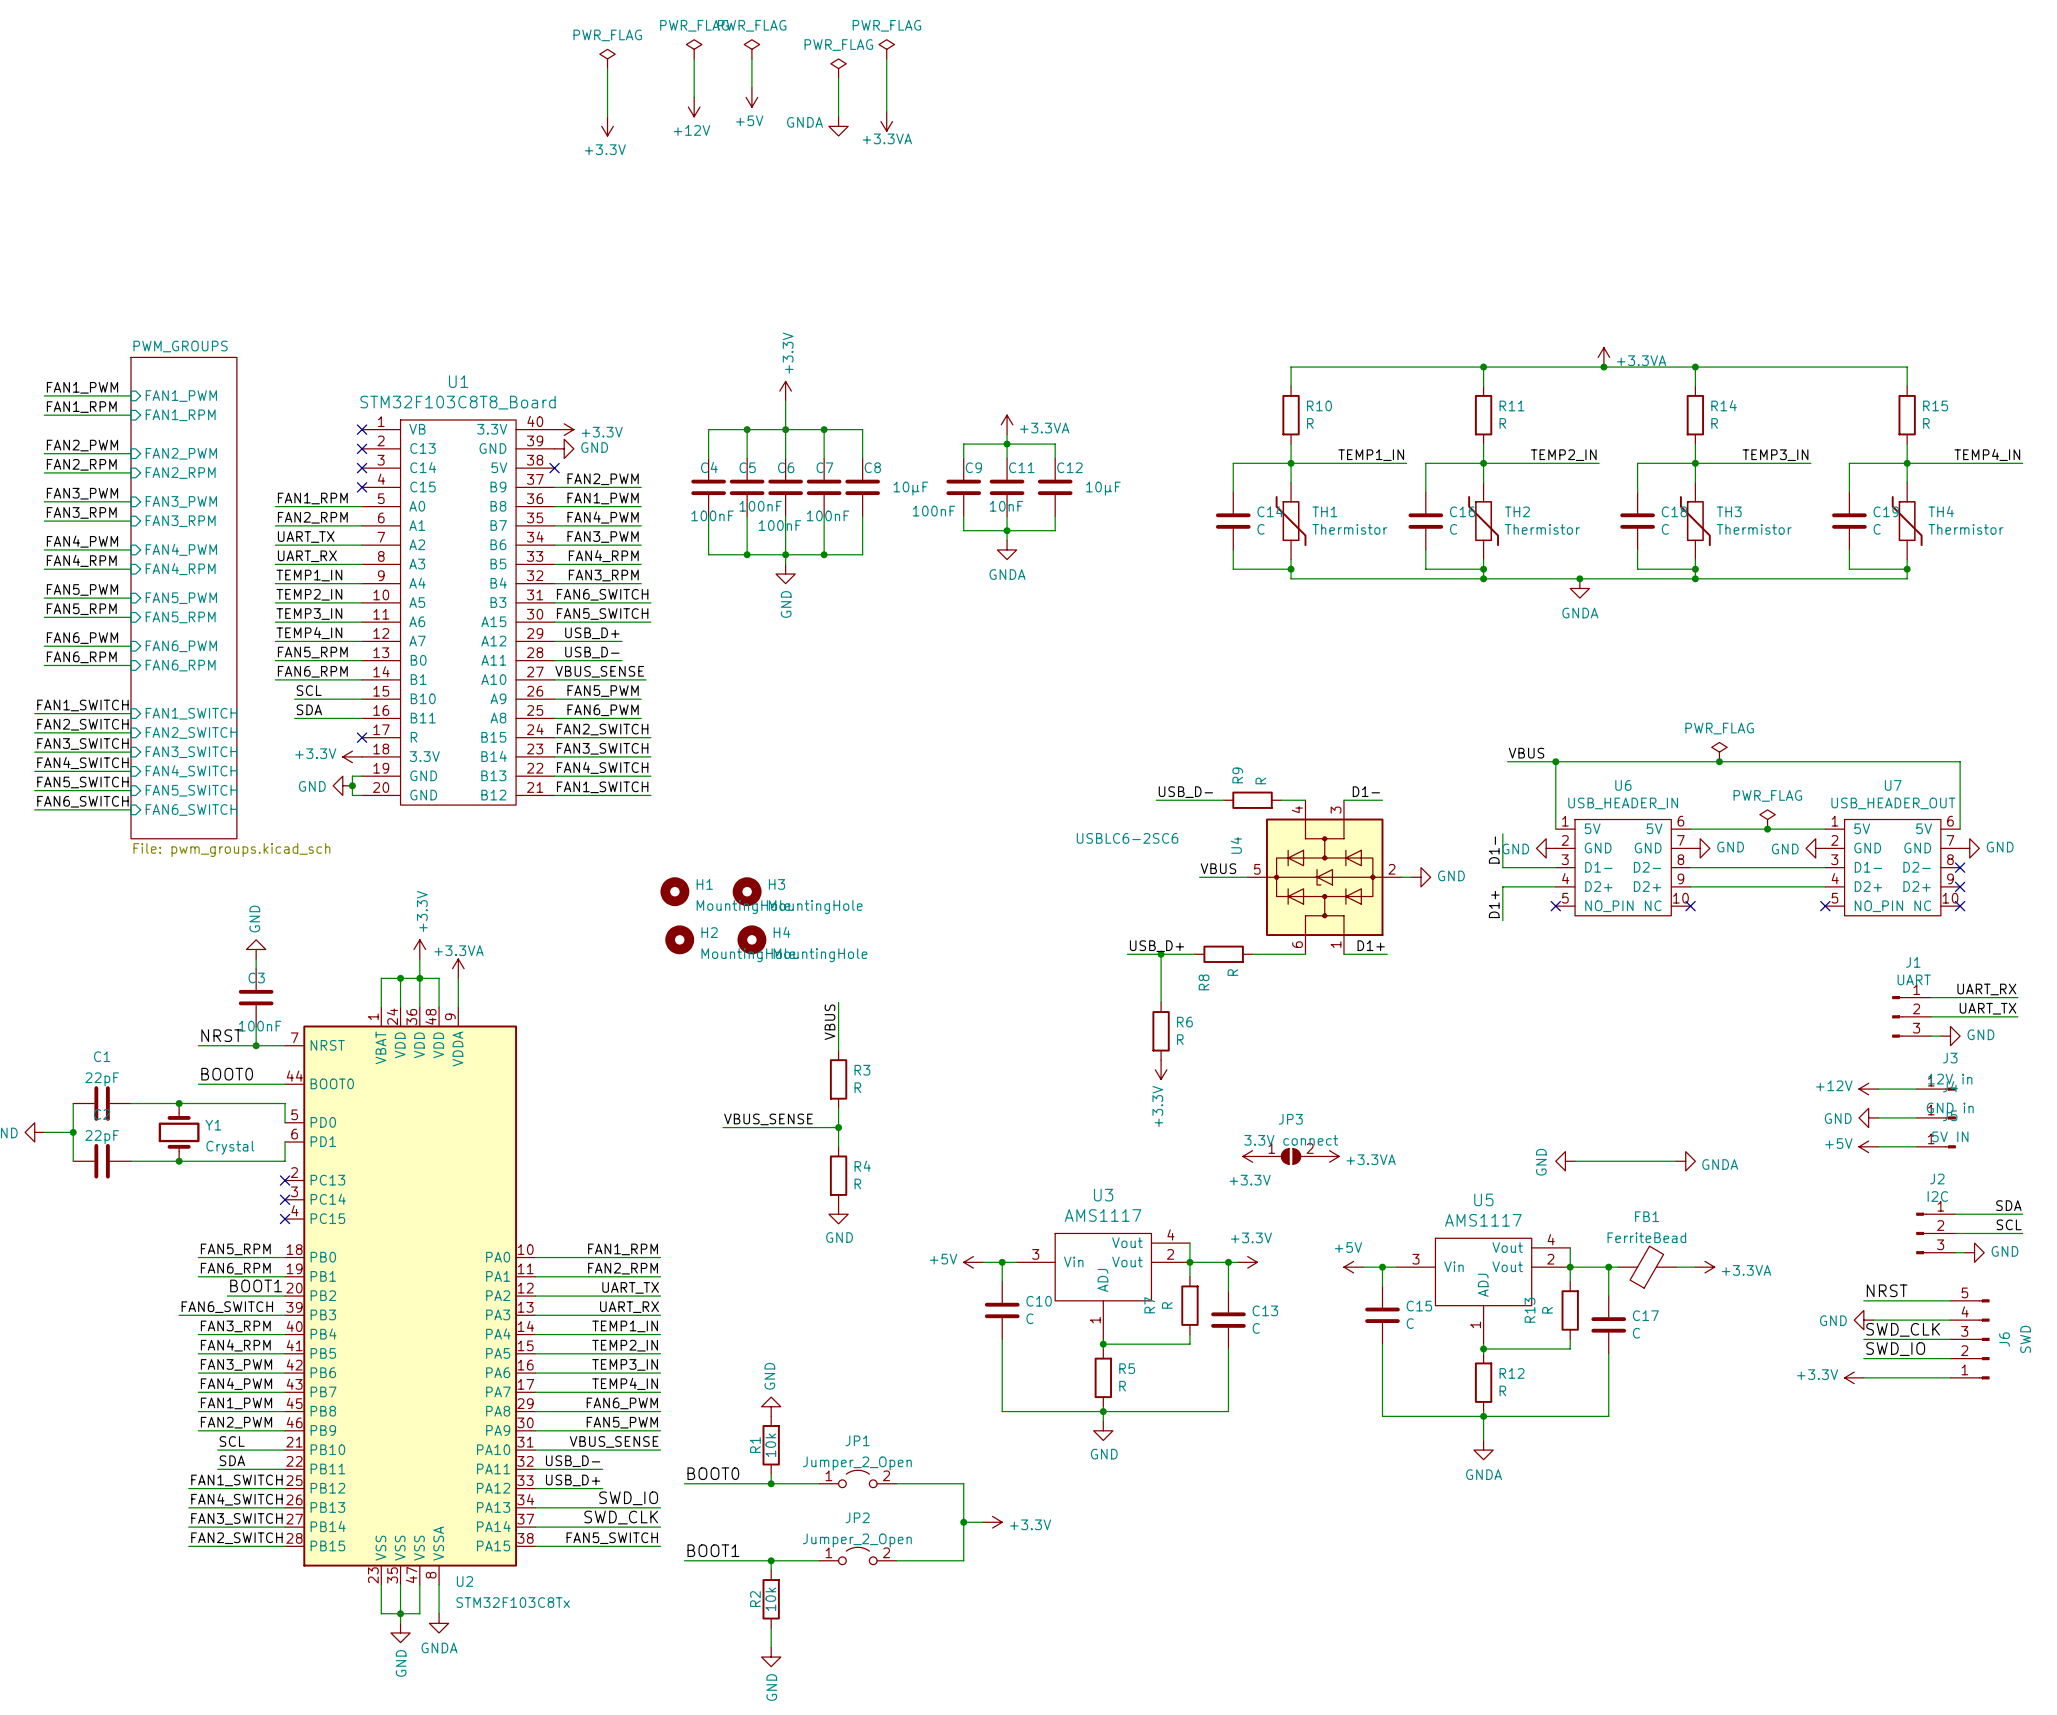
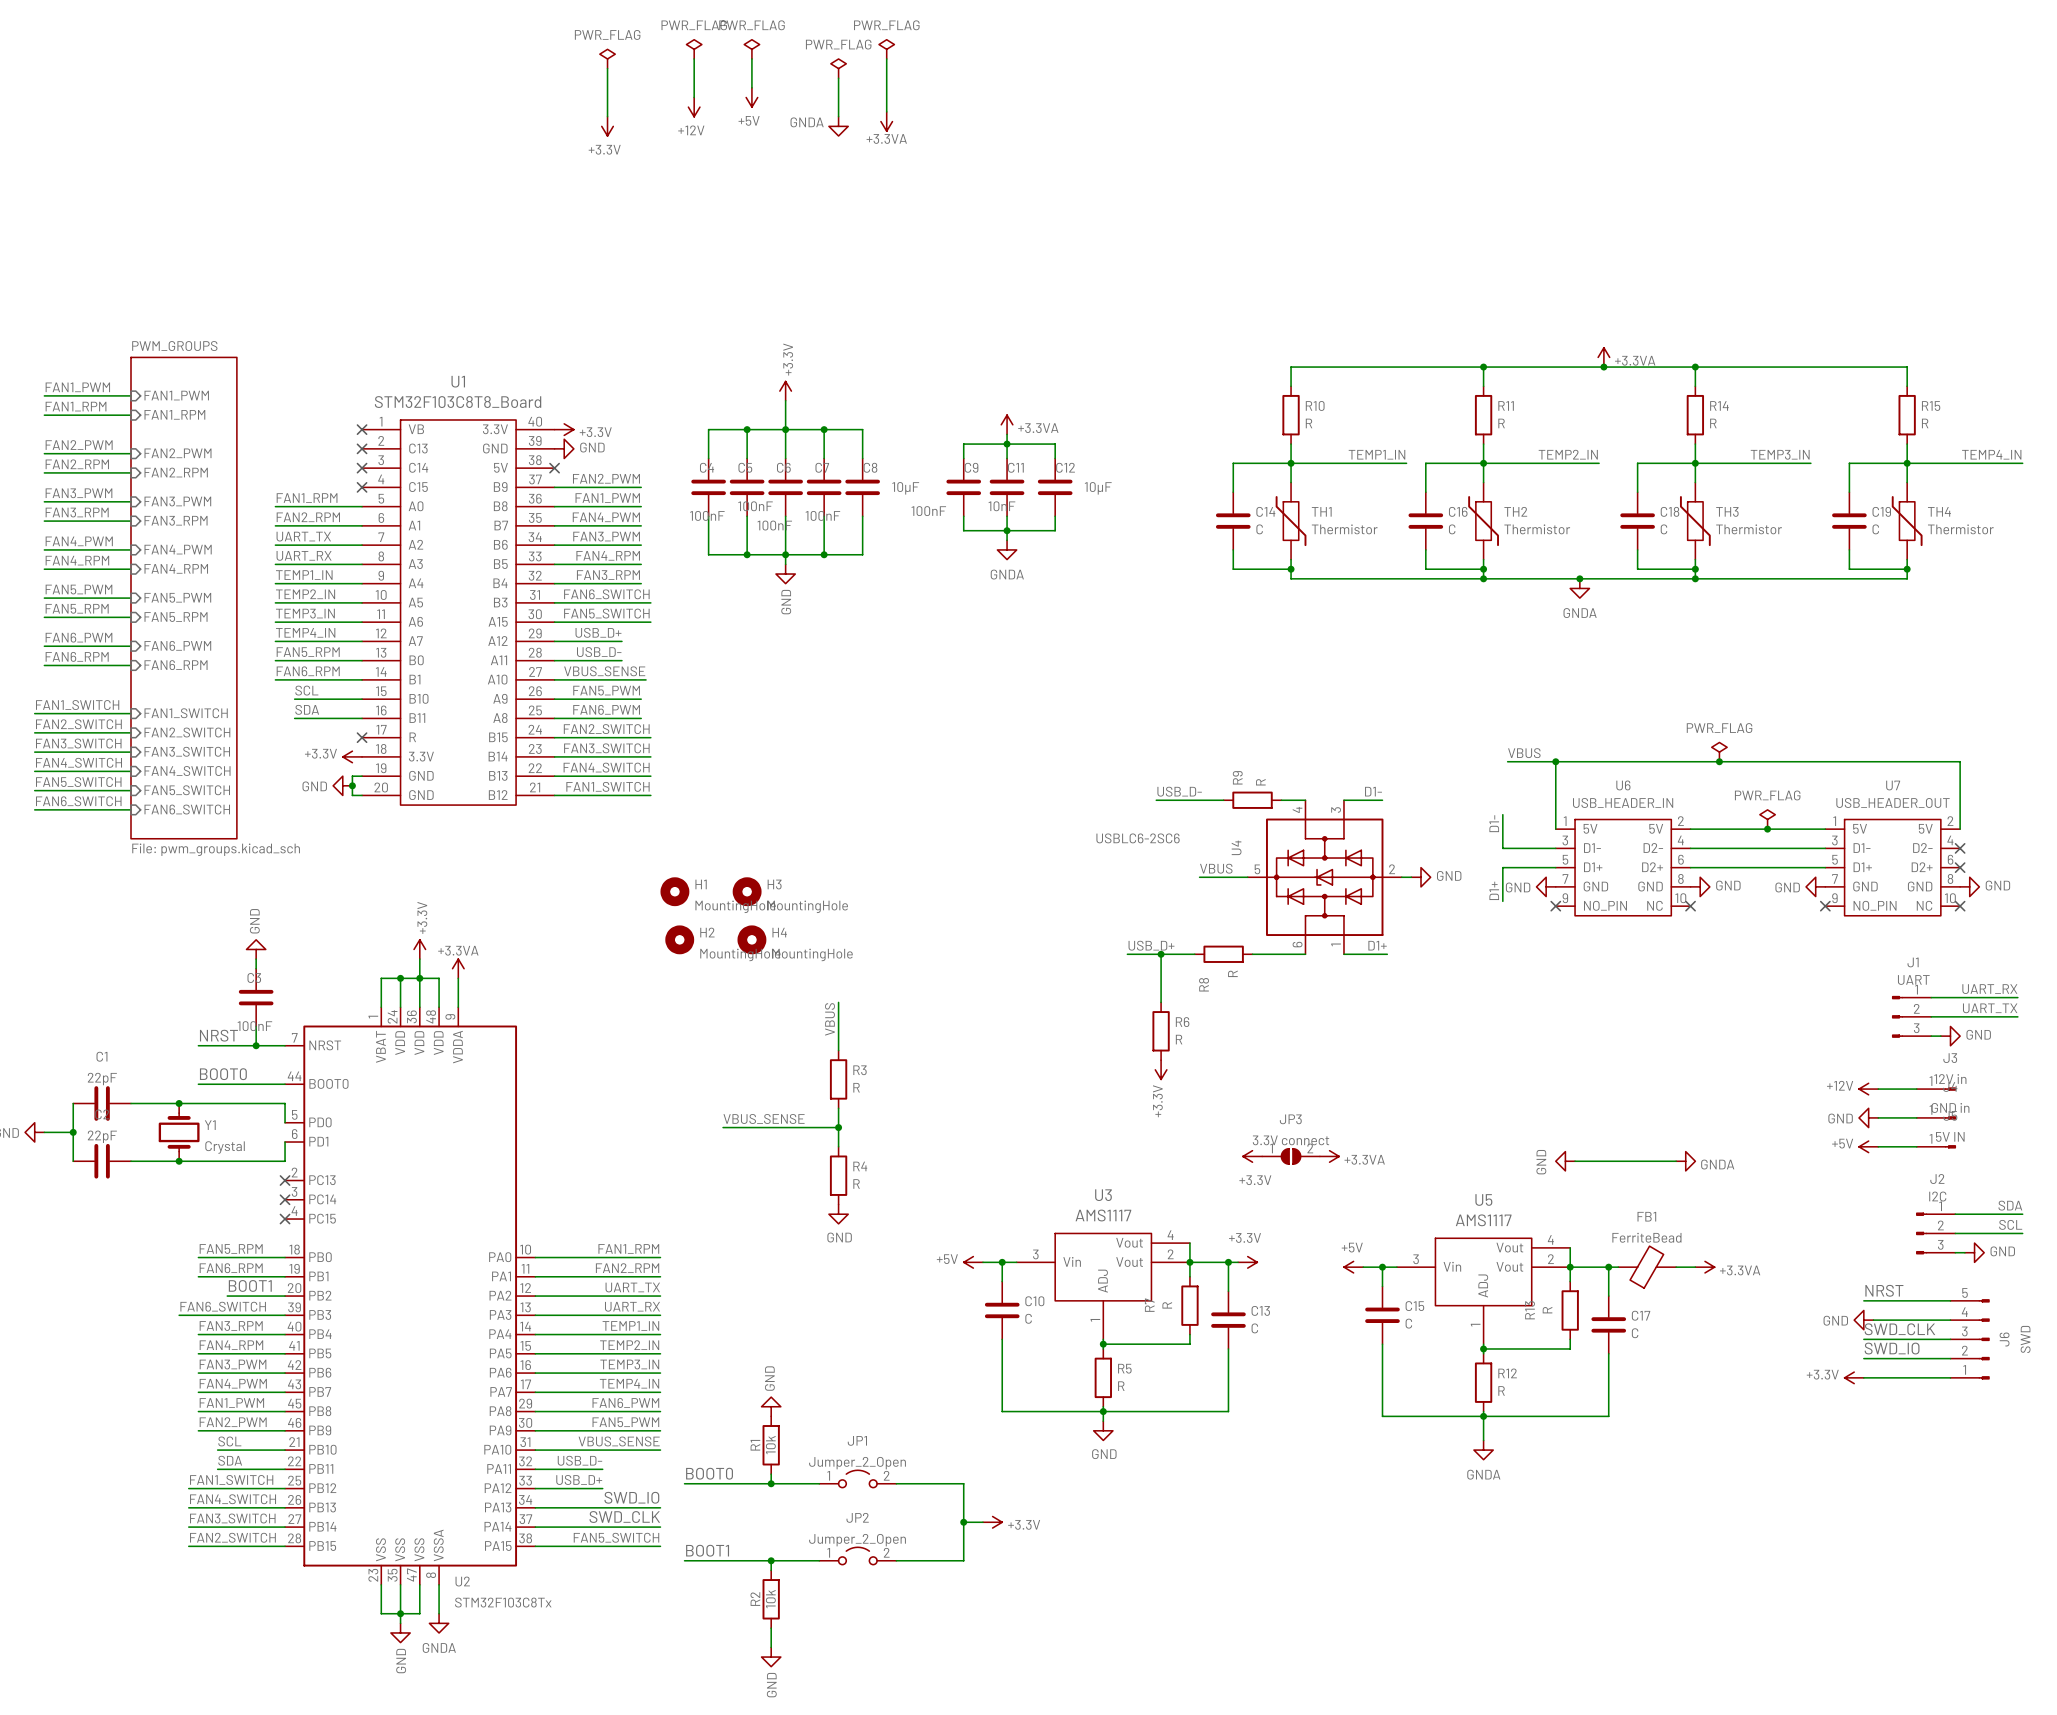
U6 symbol: [1555, 819, 1691, 916] -> [1555, 819, 1691, 916]
U7 symbol: [1825, 819, 1961, 916] -> [1825, 819, 1961, 916]
wire: (1502, 848) (1502, 867) -> (1502, 886) (1502, 867)
power symbol position: GND (1546, 848) -> GND (1546, 886)
power symbol position: GND (1700, 848) -> GND (1700, 886)
power symbol position: GND (1815, 848) -> GND (1815, 886)
power symbol position: GND (1969, 848) -> GND (1969, 886)
label position: D1- (1494, 850) -> D1- (1494, 823)
wire: (1502, 886) (1555, 886) -> (1502, 848) (1555, 848)
wire: (1690, 886) (1825, 886) -> (1690, 848) (1825, 848)
no-connect mark position: (1960, 886) -> (1960, 848)
wire: (1502, 901) (1502, 920) -> (1502, 814) (1502, 833)
label position: D1+ (1494, 904) -> D1+ (1494, 890)

